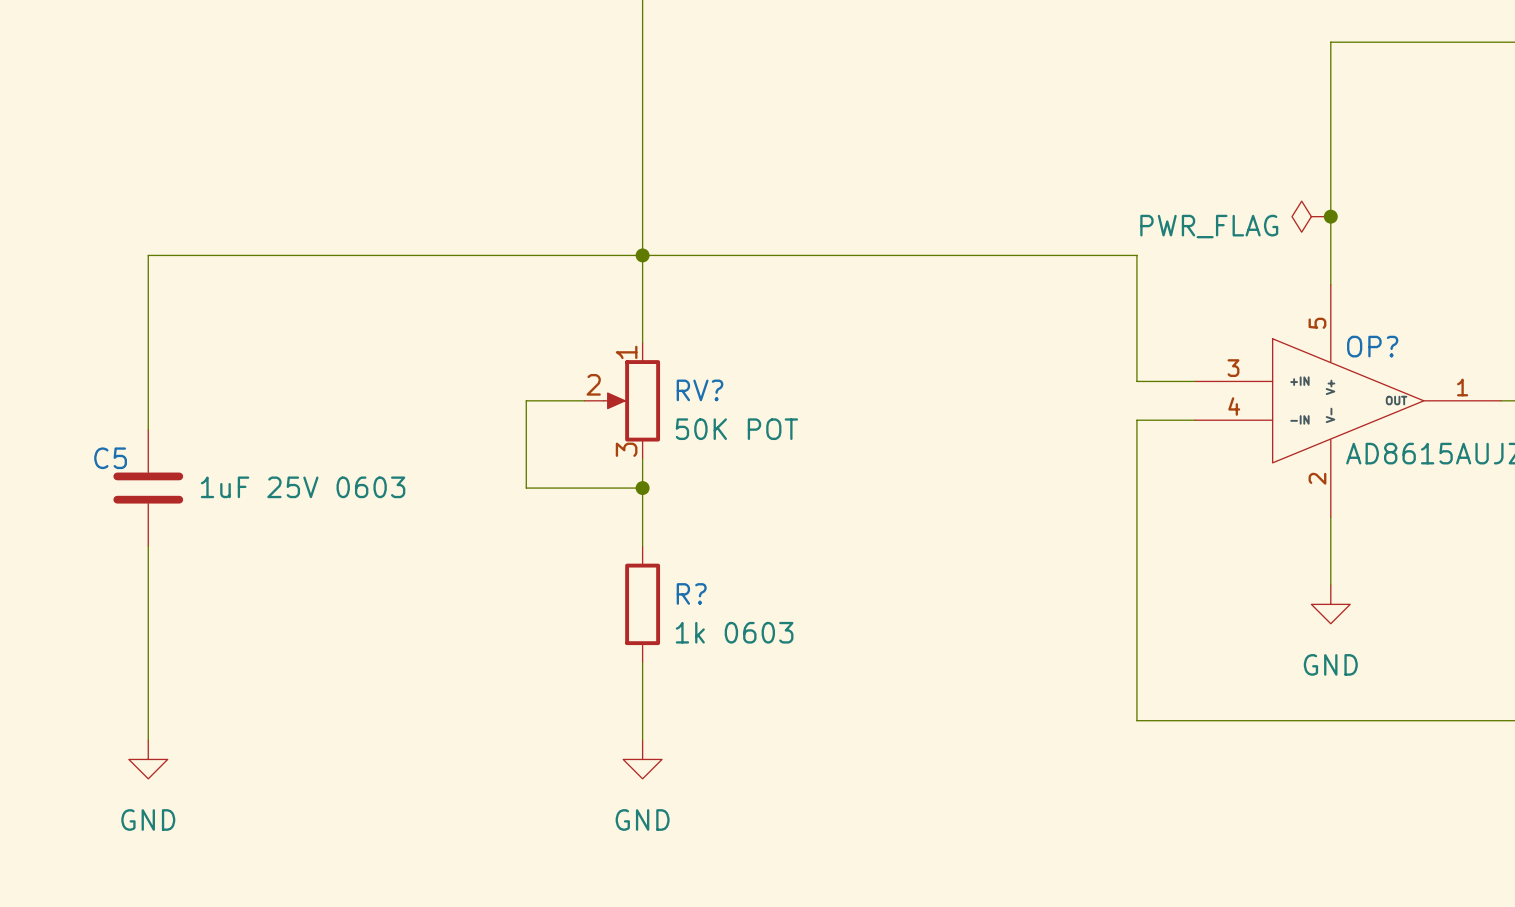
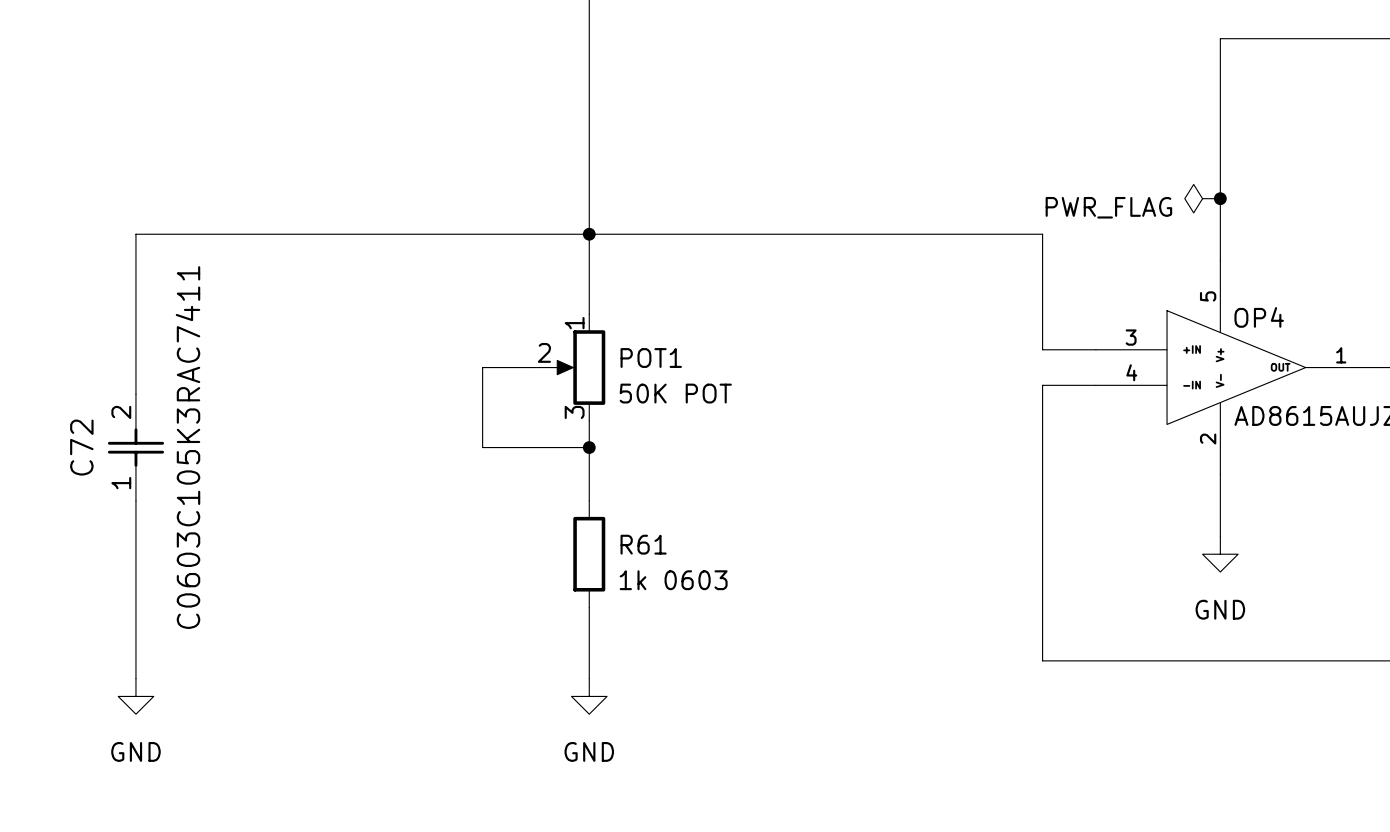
OP? name: OP? (1372, 346) -> OP4 (1259, 317)
RV? name: RV? (699, 390) -> POT1 (651, 358)
C5: 1uF 25V 0603 (148, 488) -> none
C72: none -> C0603C105K3RAC7411 (135, 447)
R? name: R? (691, 593) -> R61 (643, 544)

